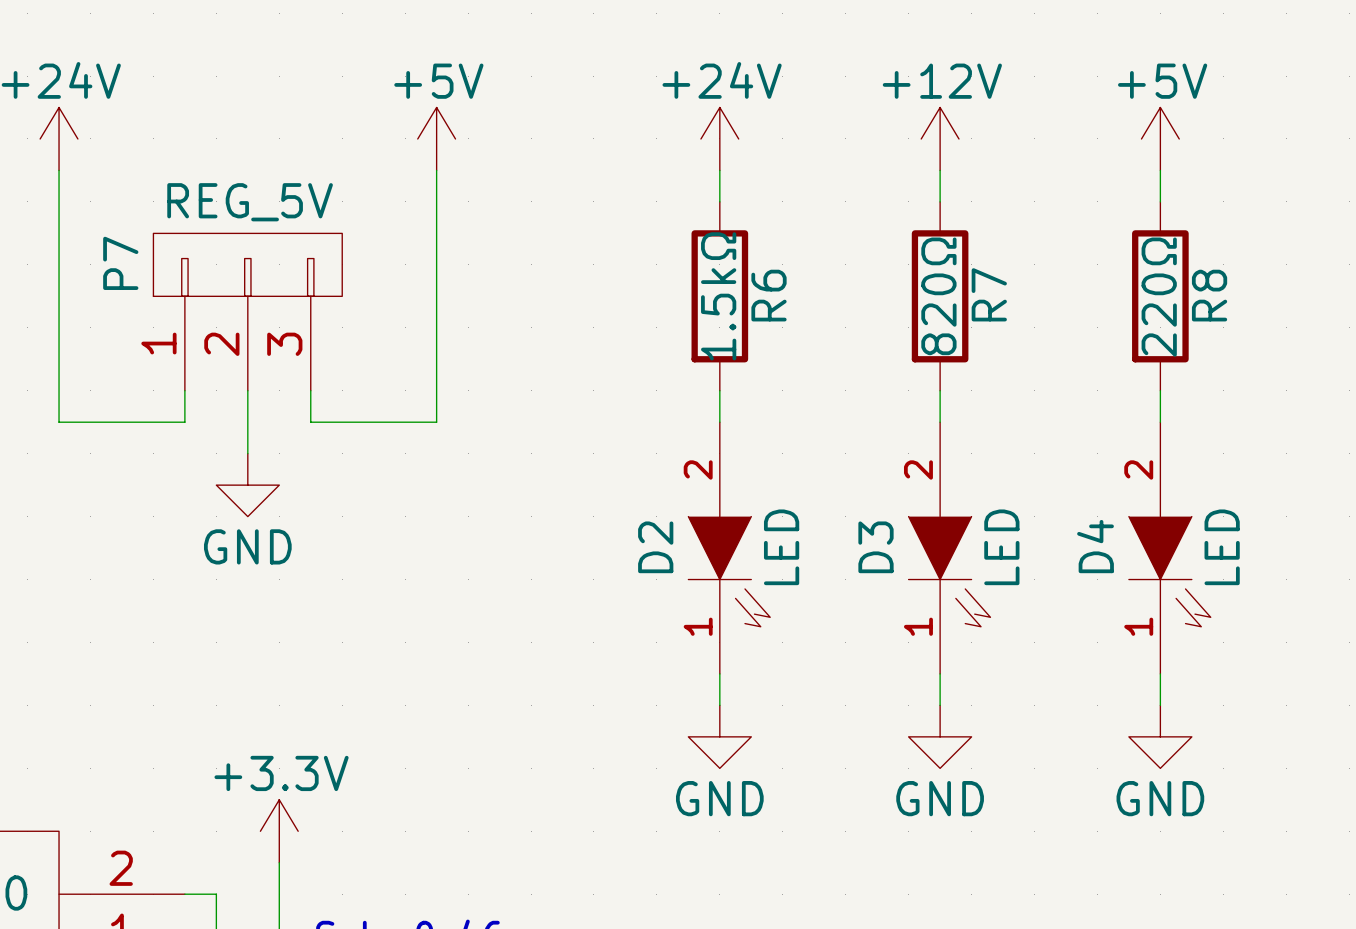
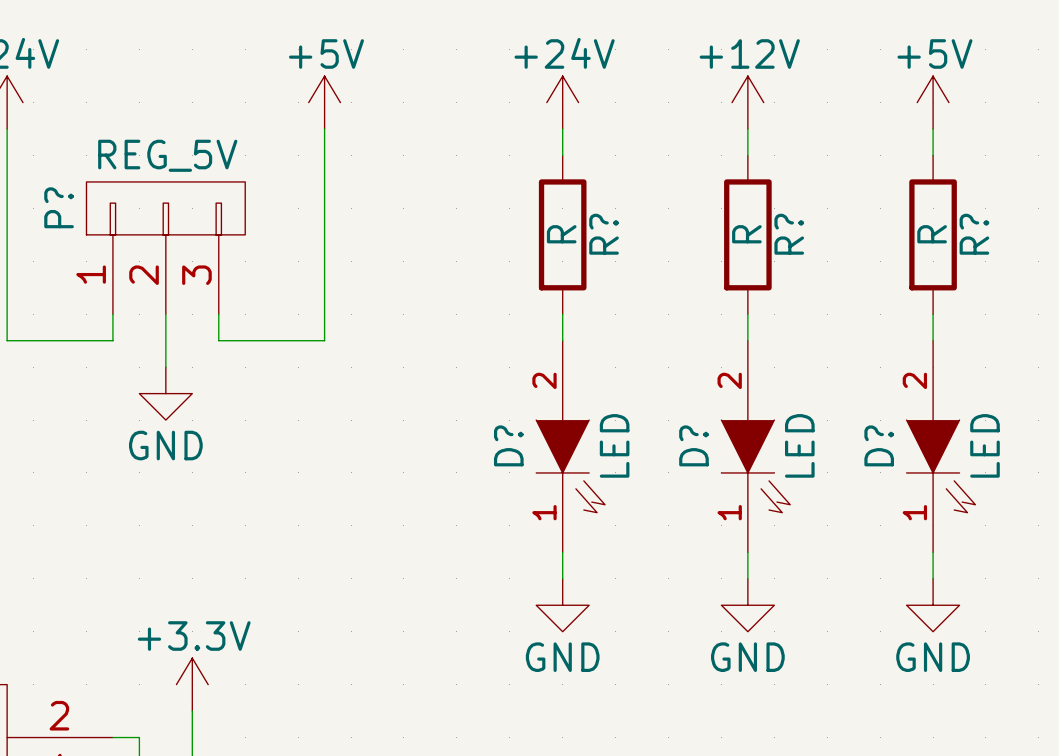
P7 name: P7 (120, 263) -> P? (59, 207)
R7 name: R7 (989, 294) -> R? (789, 234)
R6 name: R6 (769, 295) -> R? (604, 234)
R8 name: R8 (1209, 295) -> R? (974, 234)
R6 value: 1.5kΩ (718, 296) -> R (561, 234)
R7 value: 820Ω (938, 296) -> R (746, 234)
R8 value: 220Ω (1159, 297) -> R (932, 234)
D4 name: D4 (1095, 546) -> D? (879, 445)
D2 name: D2 (655, 547) -> D? (508, 445)
D3 name: D3 (875, 547) -> D? (693, 445)

